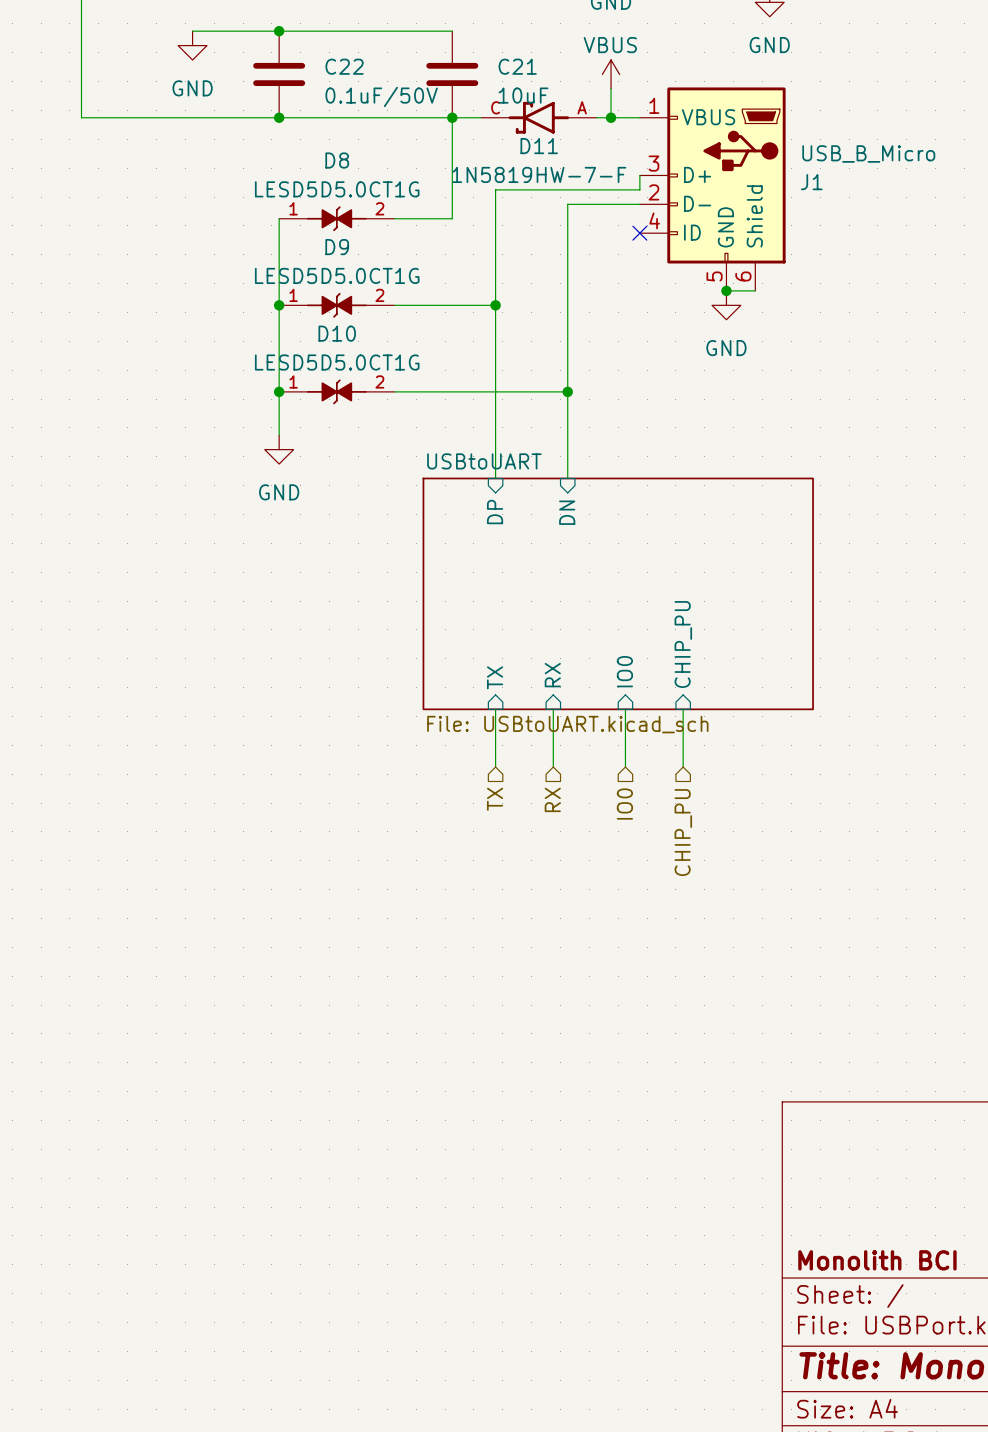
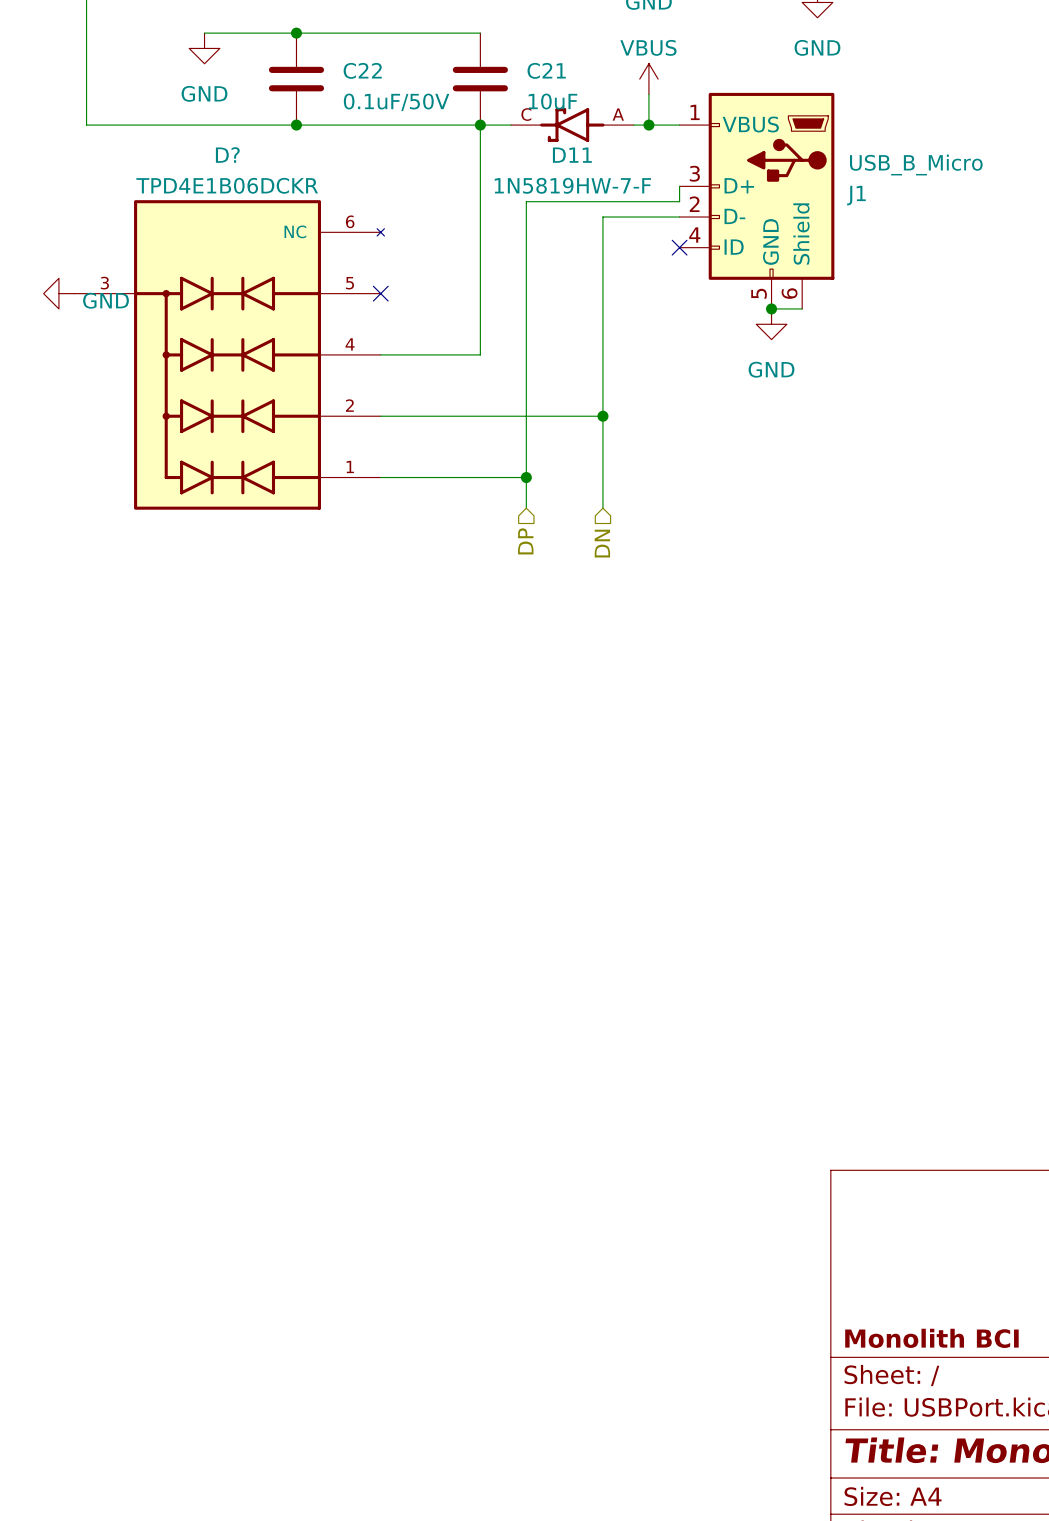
D8: LESD5D5.0CT1G (336, 218) -> none
wire: (394, 218) (452, 218) -> (380, 354) (480, 354) (480, 232)
no-connect mark: none -> (380, 293)
junction: (279, 305) -> none
D9: LESD5D5.0CT1G (336, 305) -> none
wire: (394, 305) (495, 305) -> none
junction: (495, 305) -> none
D?: none -> TPD4E1B06DCKR (229, 354)
junction: (279, 391) -> none
D10: LESD5D5.0CT1G (336, 391) -> none
power symbol rotation: 0° (279, 449) -> 90° clockwise (58, 293)
power symbol position: GND (279, 449) -> GND (58, 293)
wire: none -> (380, 477) (526, 477)
junction: none -> (526, 477)
power symbol text position: GND (279, 492) -> GND (106, 300)
hierarchical label: none -> DP (525, 541)
sheet pin: DP (495, 512) -> none
hierarchical label: none -> DN (602, 543)
sheet pin: DN (567, 512) -> none
sheet USBtoUART: File: USBtoUART.kicad_sch (618, 593) -> none
sheet pin: CHIP_PU (683, 644) -> none
sheet pin: IO0 (624, 671) -> none
sheet pin: RX (552, 675) -> none
sheet pin: TX (495, 677) -> none
wire: (495, 709) (495, 767) -> none
wire: (553, 709) (553, 767) -> none
wire: (625, 709) (625, 767) -> none
wire: (683, 709) (683, 767) -> none
hierarchical label: TX (495, 799) -> none
hierarchical label: RX (552, 799) -> none
hierarchical label: IO0 (624, 804) -> none
hierarchical label: CHIP_PU (683, 832) -> none

